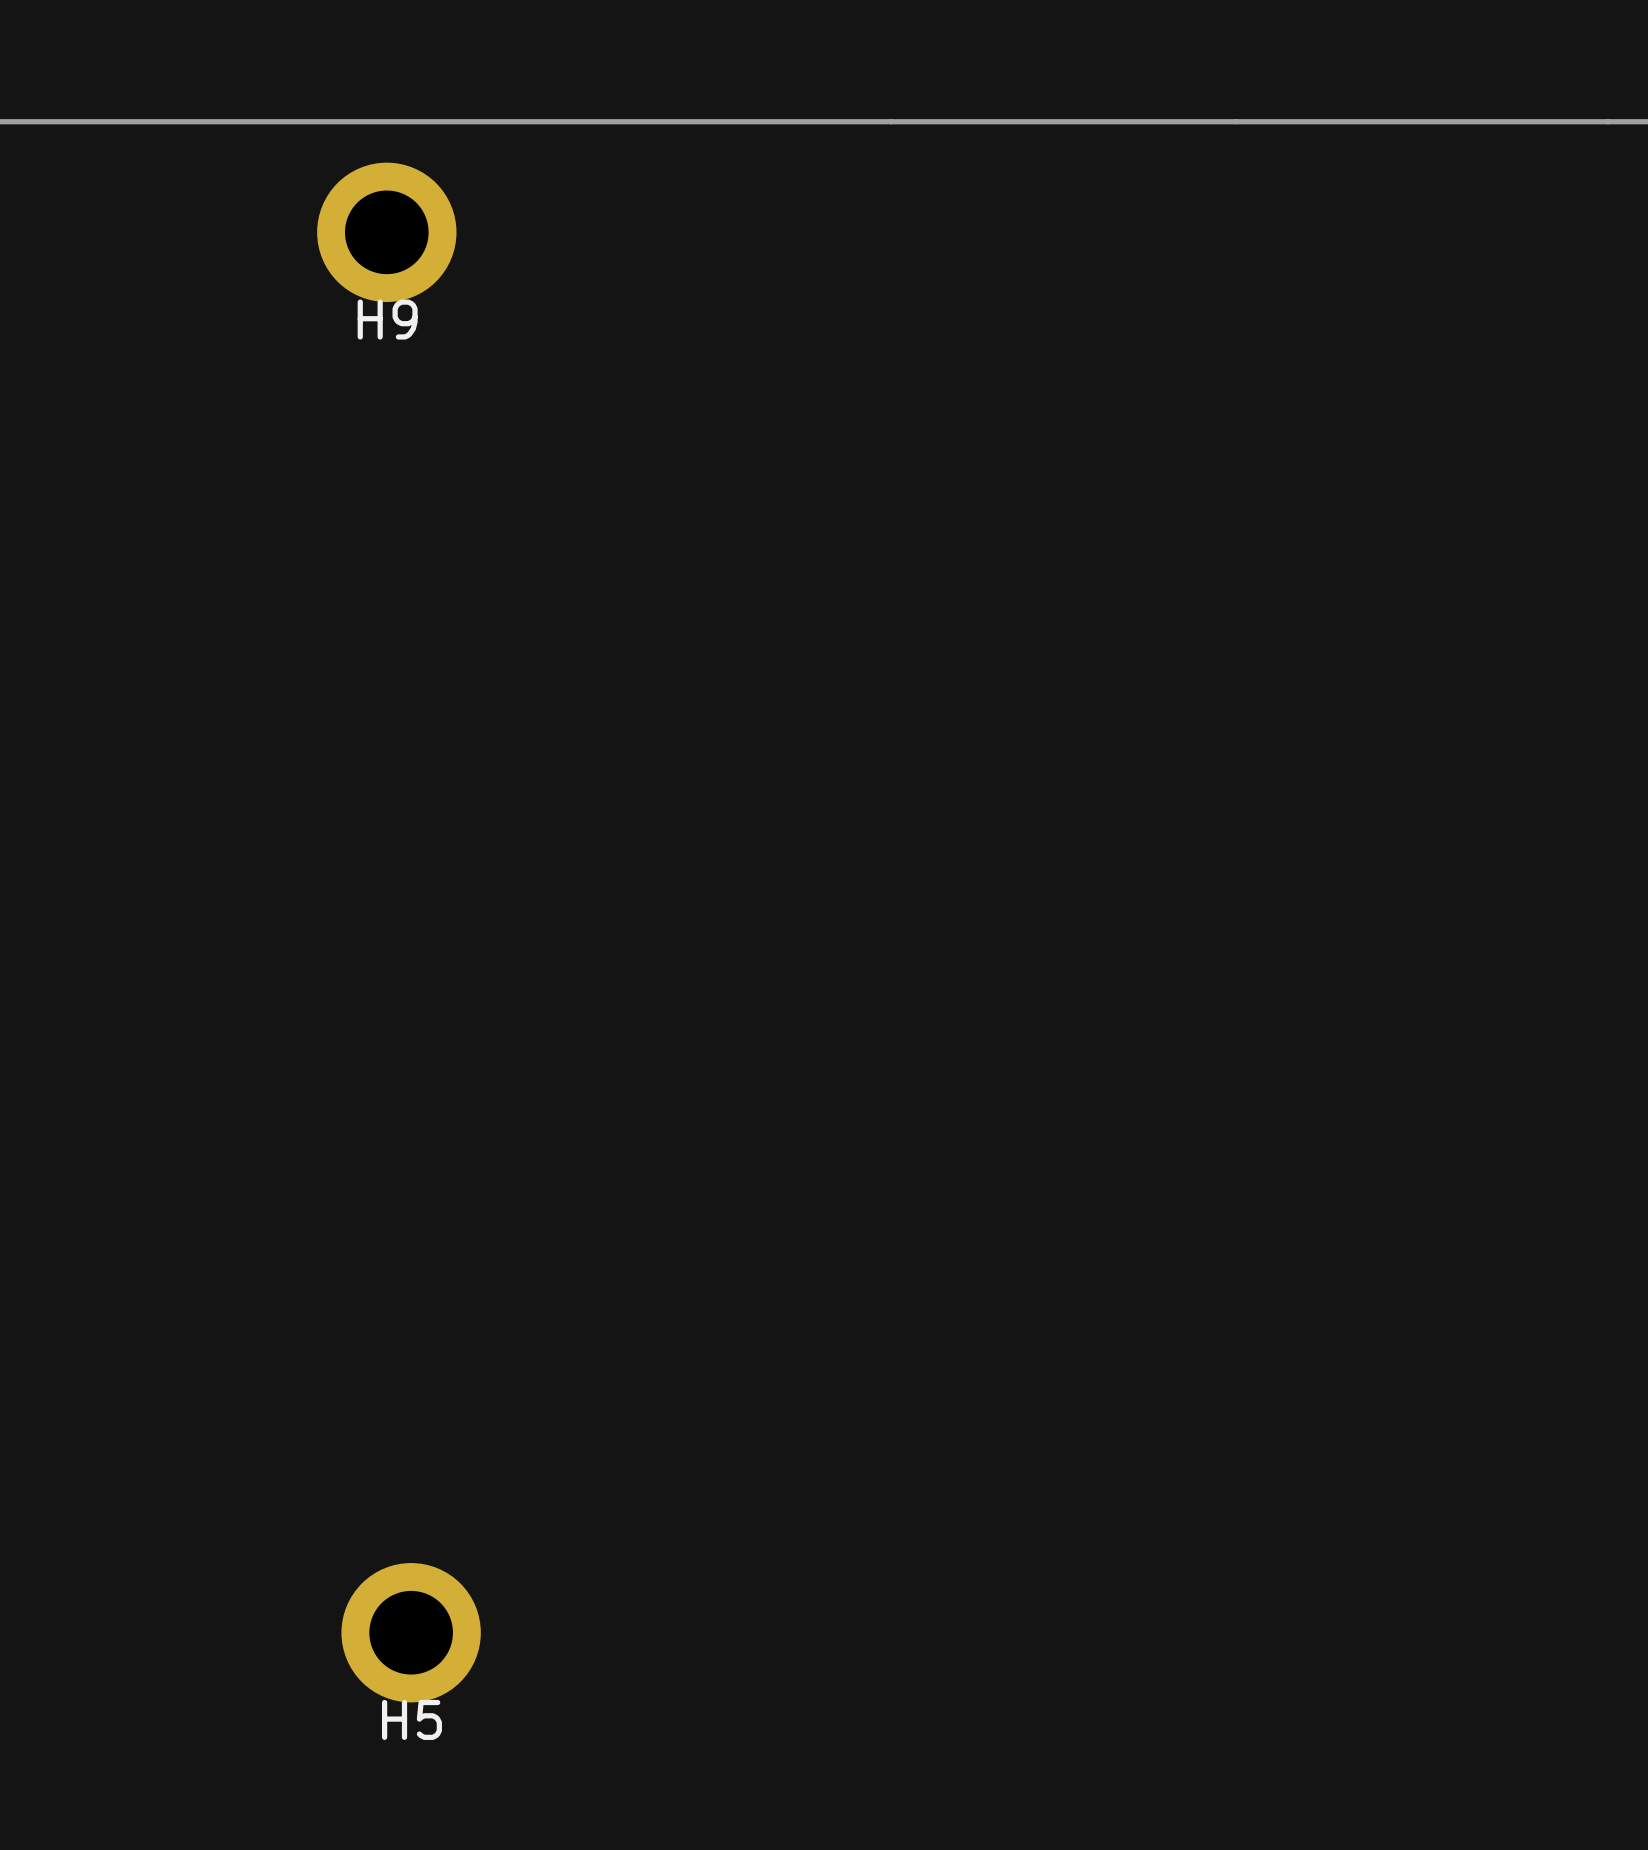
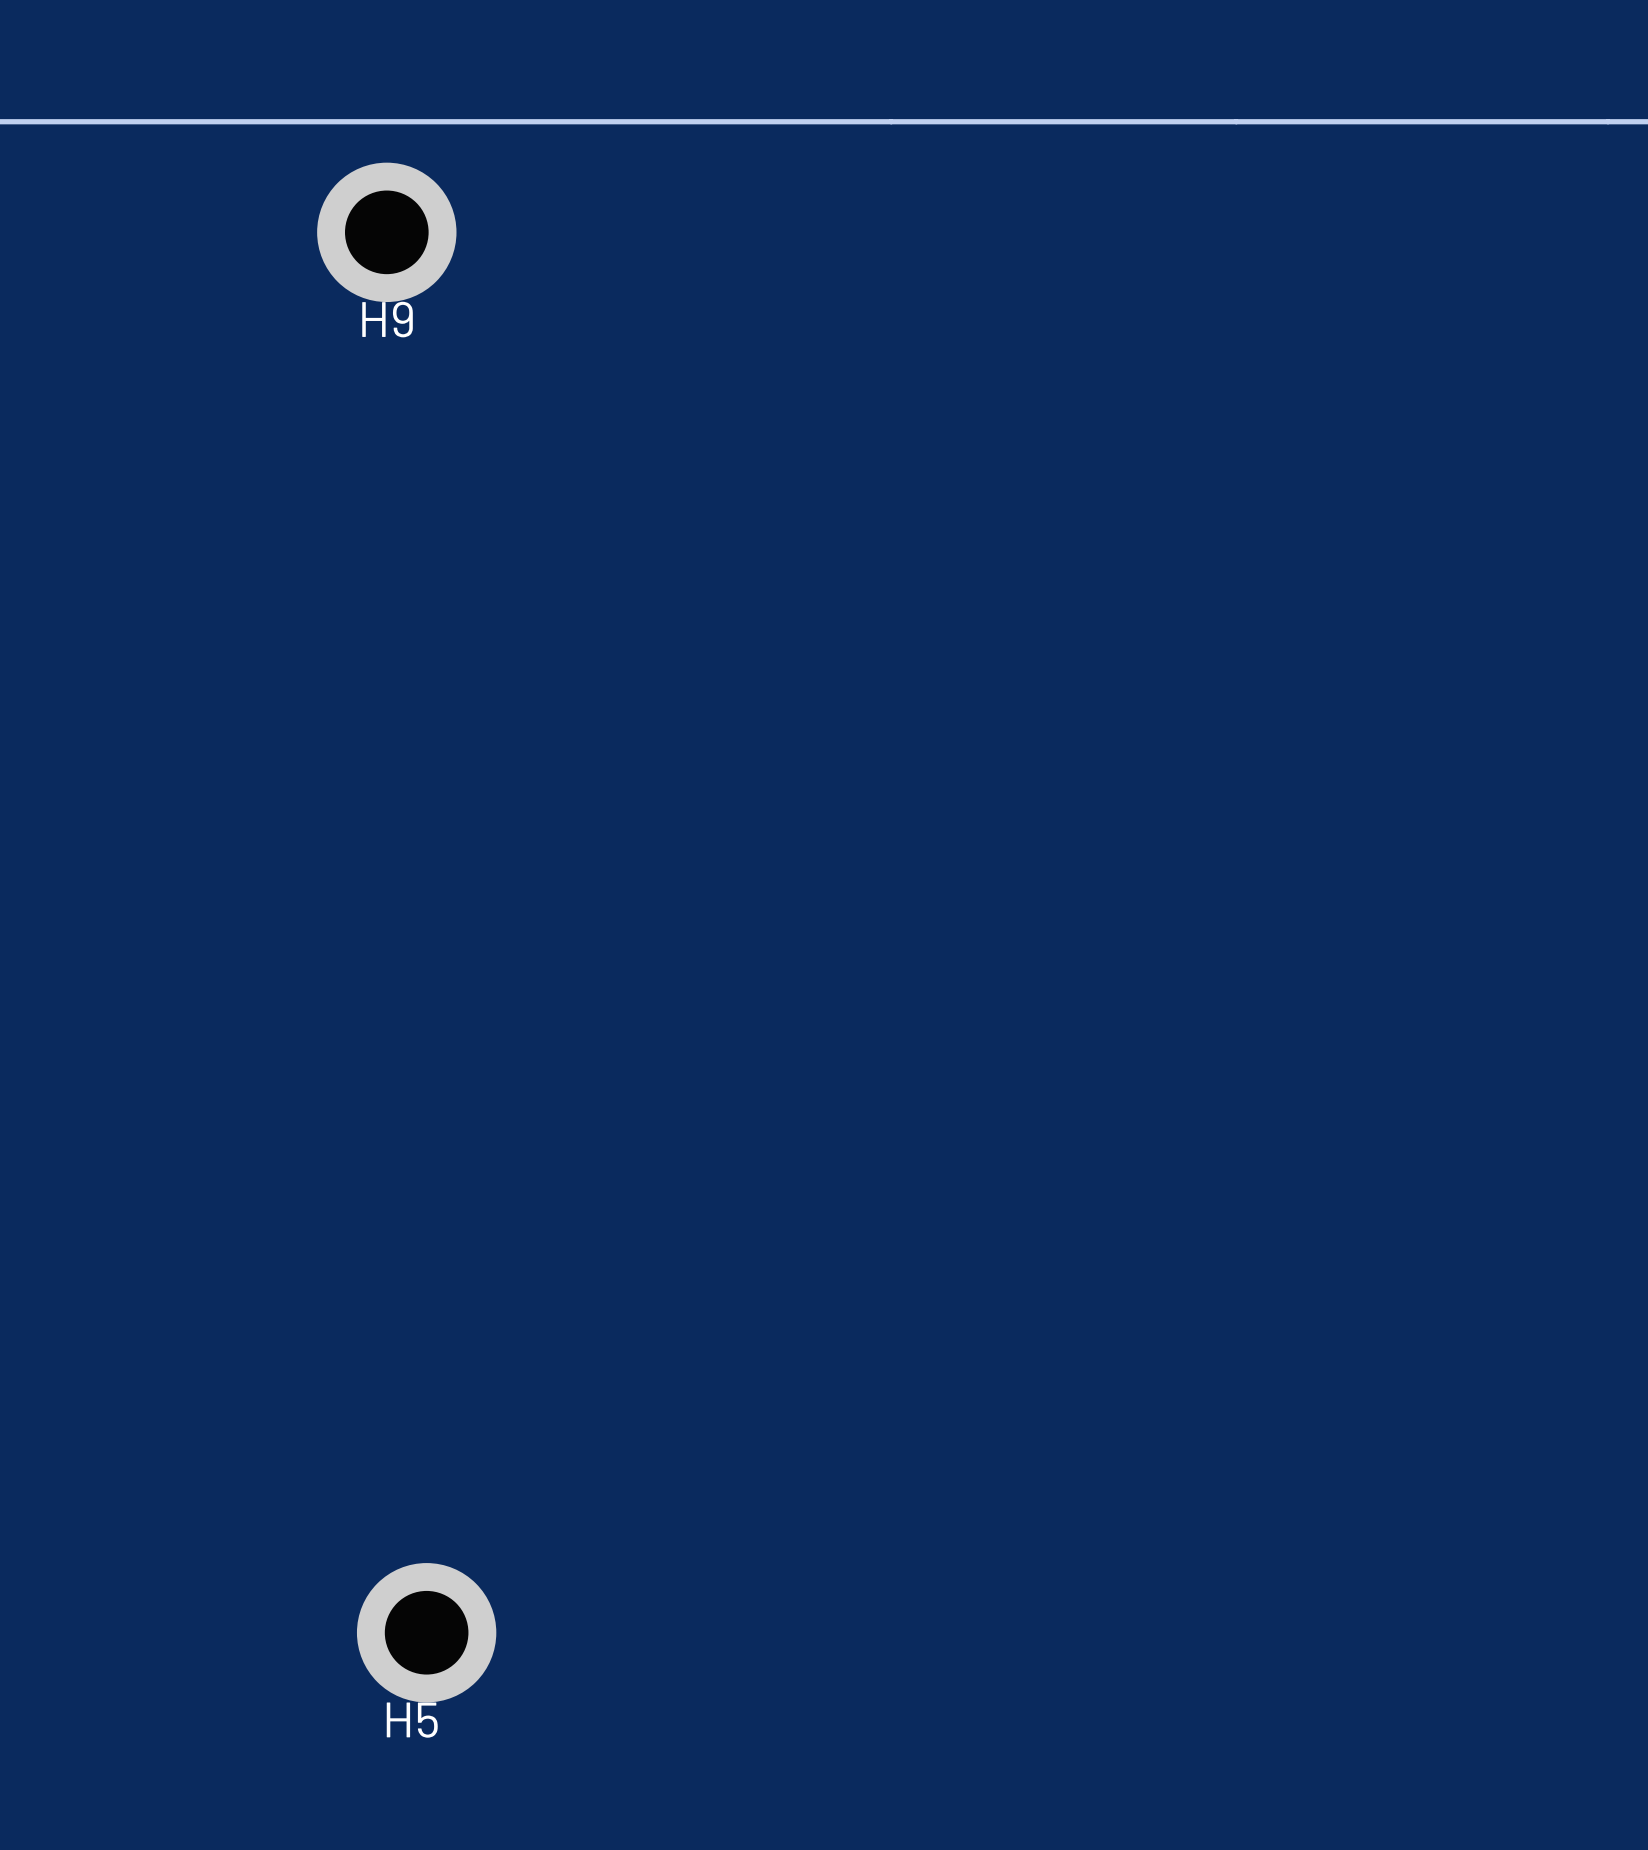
H5 position: (411, 1632) -> (426, 1632)

